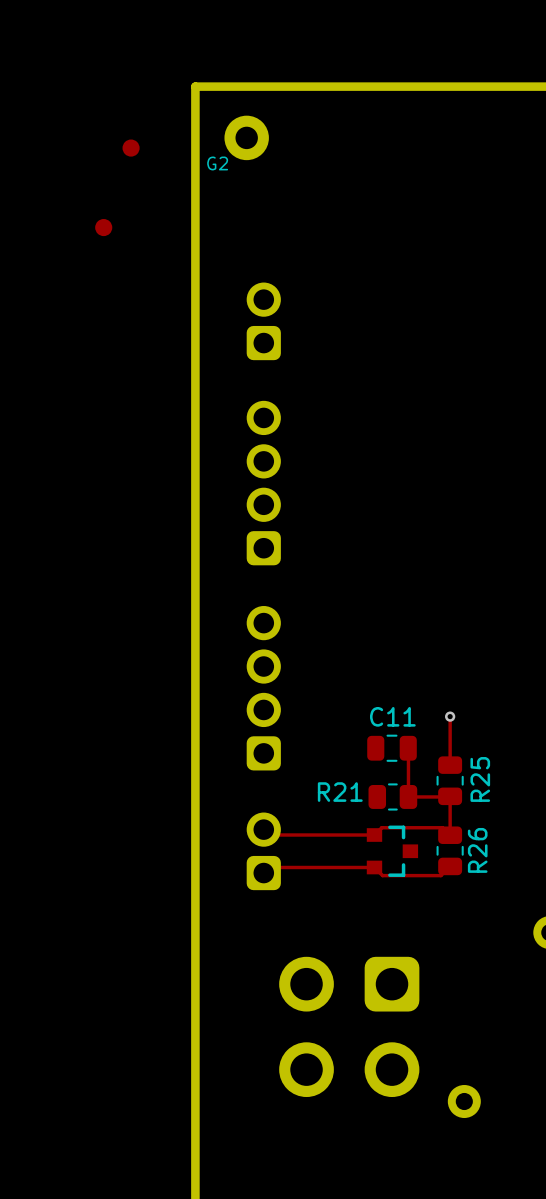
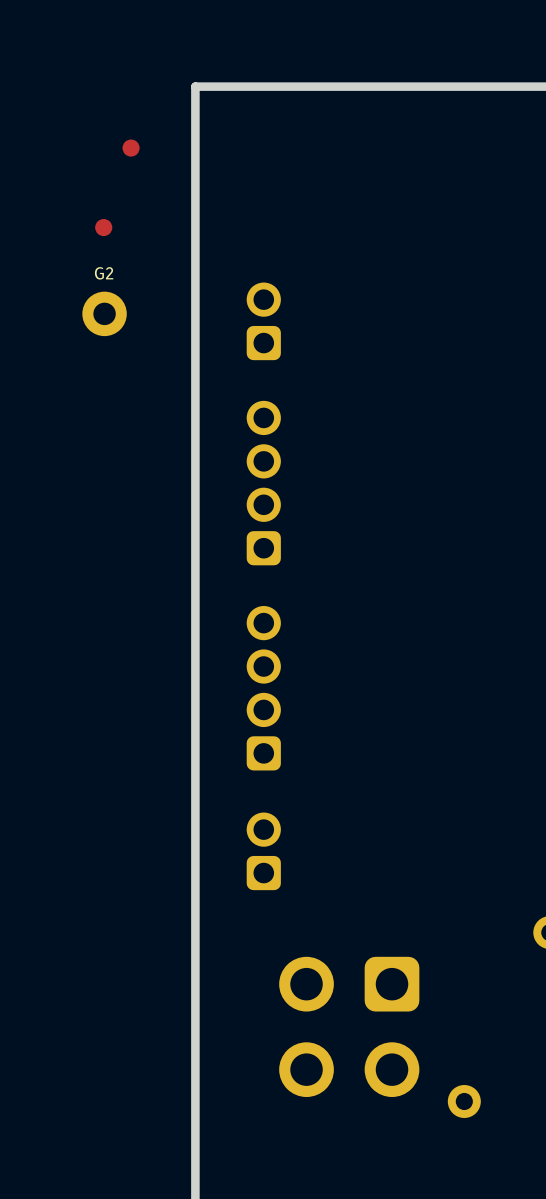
G2 position: (246, 137) -> (104, 313)
G2 name position: G2 (217, 163) -> G2 (104, 273)
track: (450, 716) (450, 765) -> none
via: (450, 716) -> none
C11: (392, 748) -> none
track: (408, 748) (408, 796) (450, 796) (450, 835) (442, 827) (381, 827) (374, 835) (269, 835) (263, 829) -> none
R25: (450, 780) -> none
R21: (392, 796) -> none
R26: (450, 850) -> none
part: (392, 851) -> none
track: (450, 866) (440, 875) (382, 875) (374, 867) (269, 867) (263, 873) -> none

